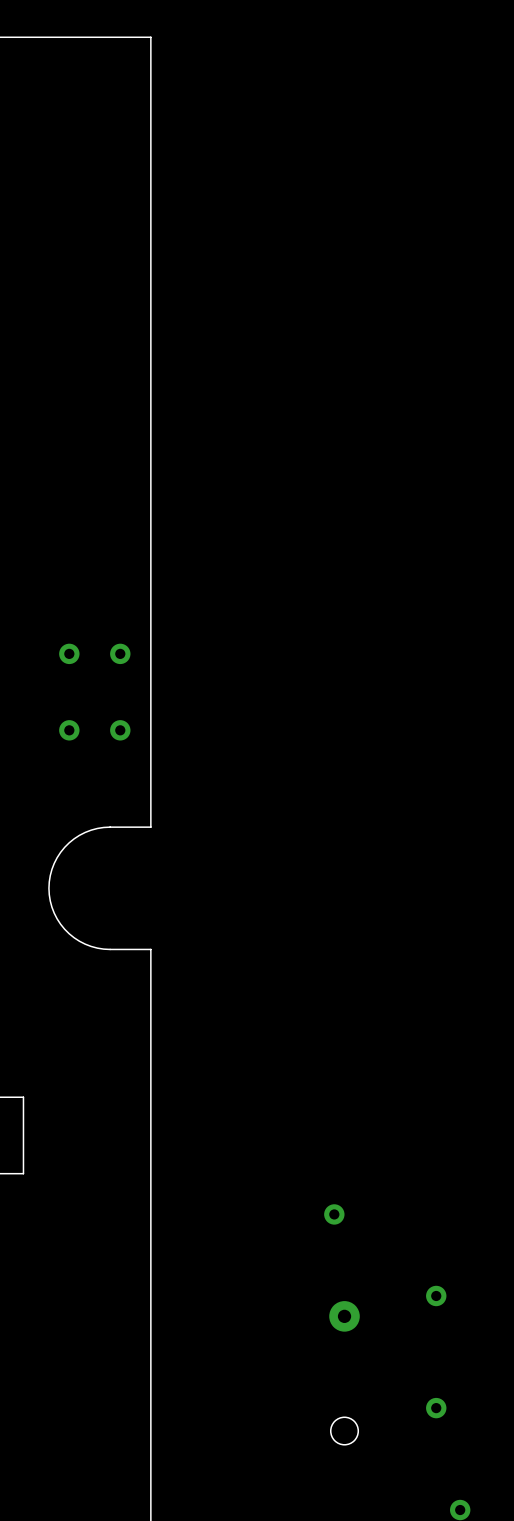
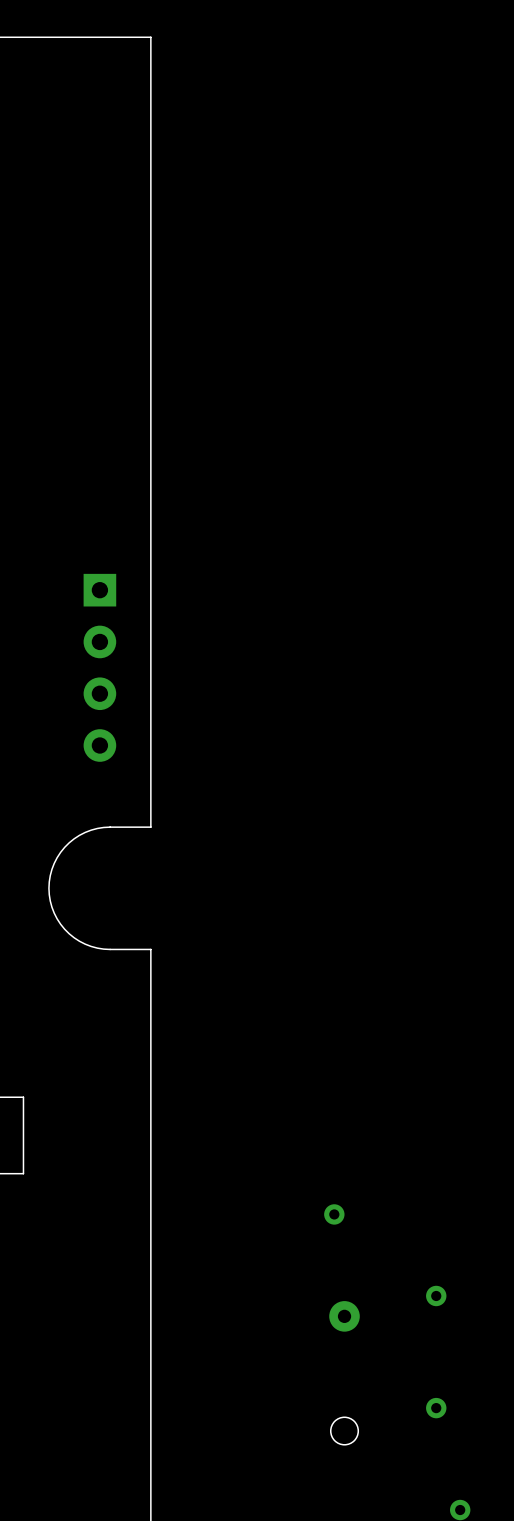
part: (69, 653) -> none
part: (120, 653) -> none
part: none -> (99, 667)
part: (69, 730) -> none
part: (120, 730) -> none

